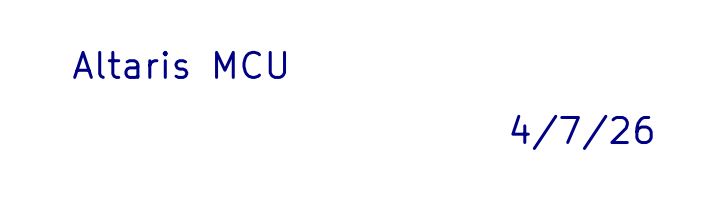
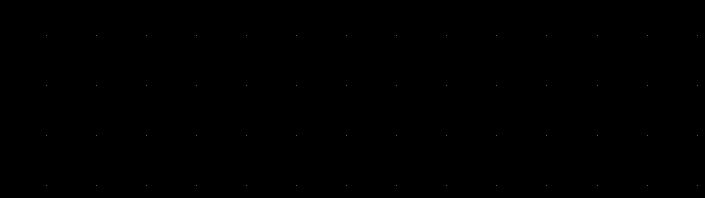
text: Altaris MCU (179, 64) -> none
text: 4/7/26 (582, 132) -> none

